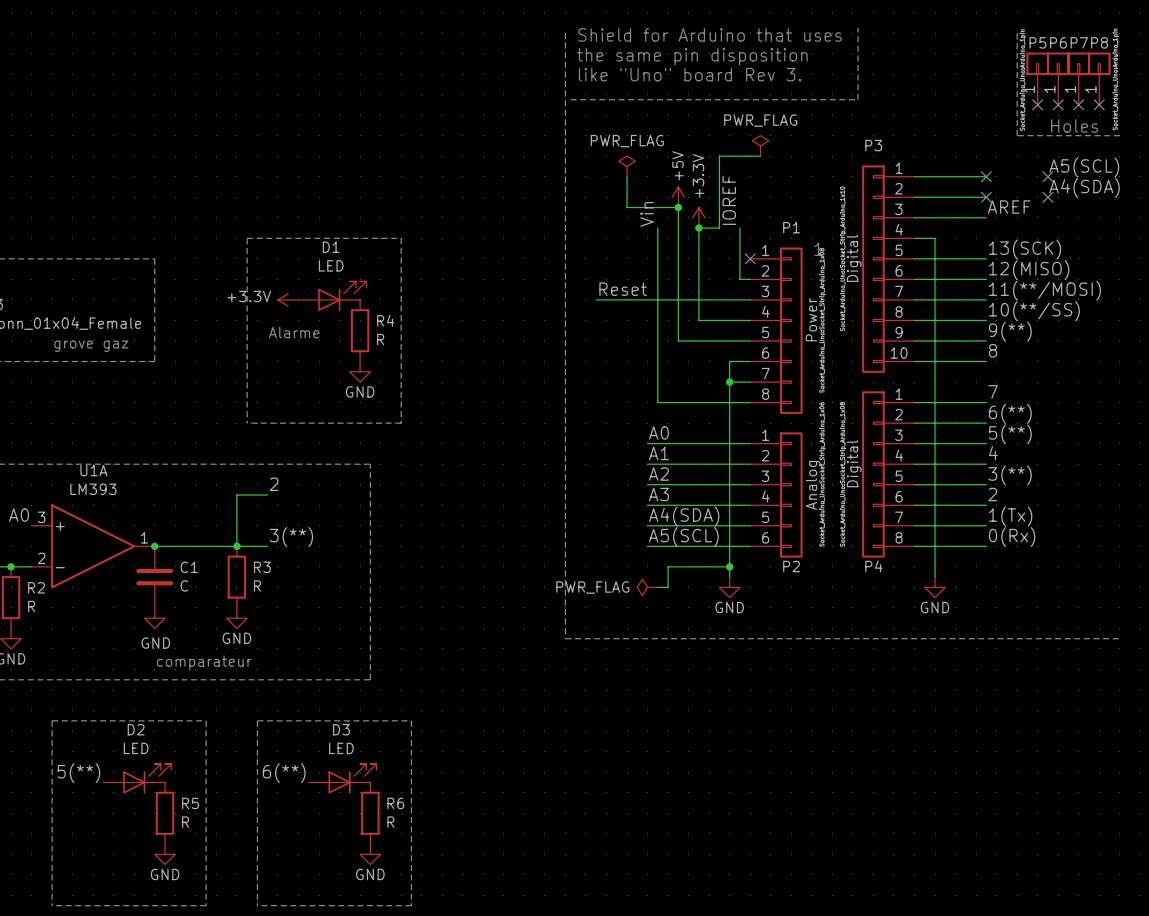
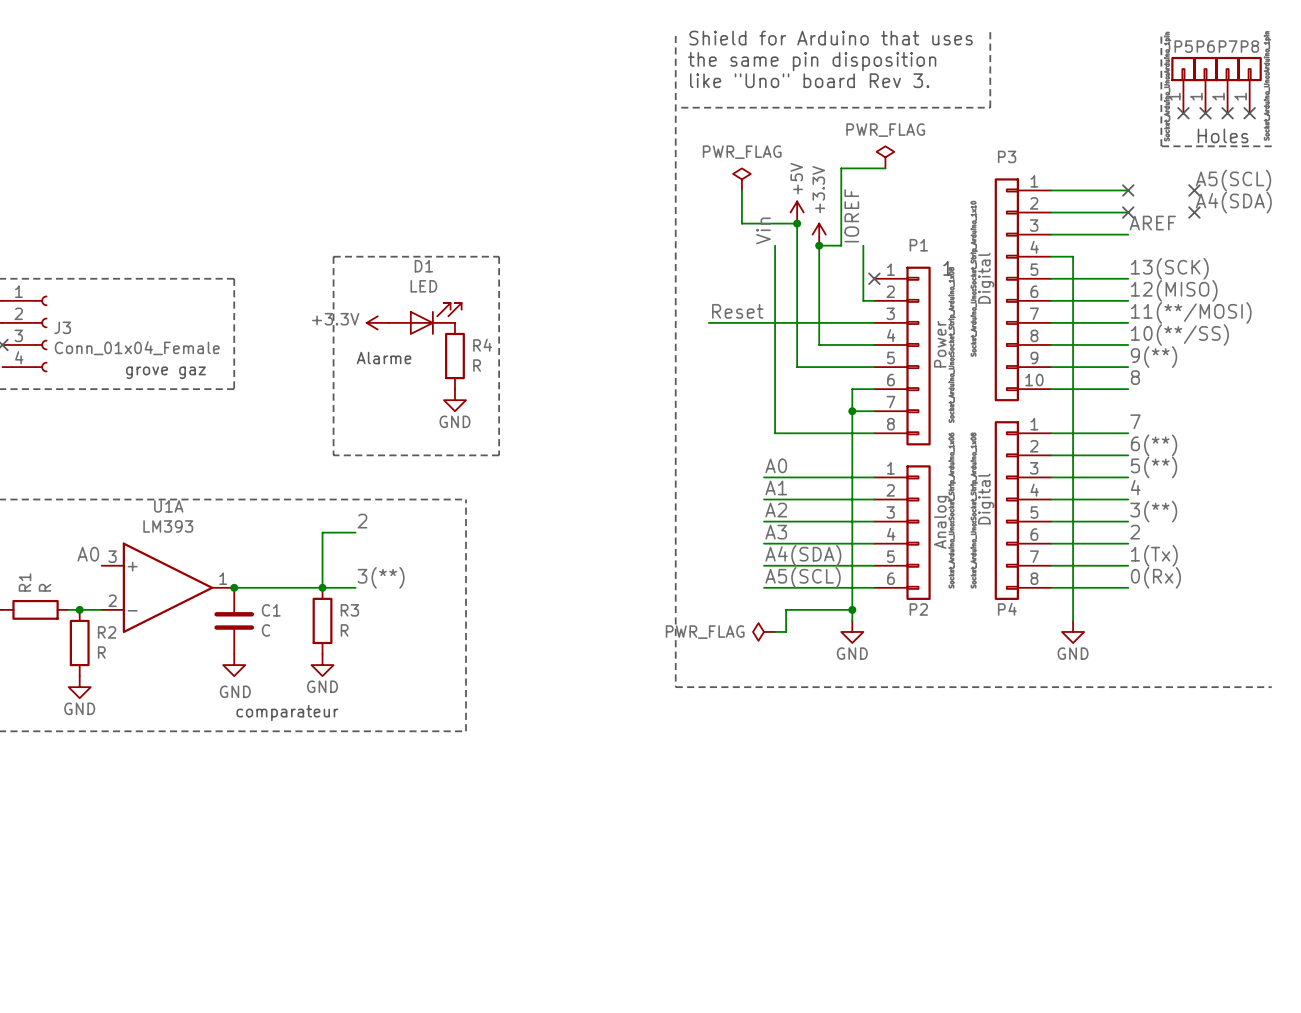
line: (52, 720) (206, 720) (206, 905) (52, 905) (52, 720) -> none
line: (257, 720) (411, 720) (411, 905) (257, 905) (257, 720) -> none
label: 5(**) (78, 773) -> none
label: 6(**) (284, 773) -> none
D2: LED (137, 778) -> none
D3: LED (342, 778) -> none
R5: R (165, 813) -> none
R6: R (370, 813) -> none
power symbol: GND (165, 854) -> none
power symbol: GND (370, 854) -> none

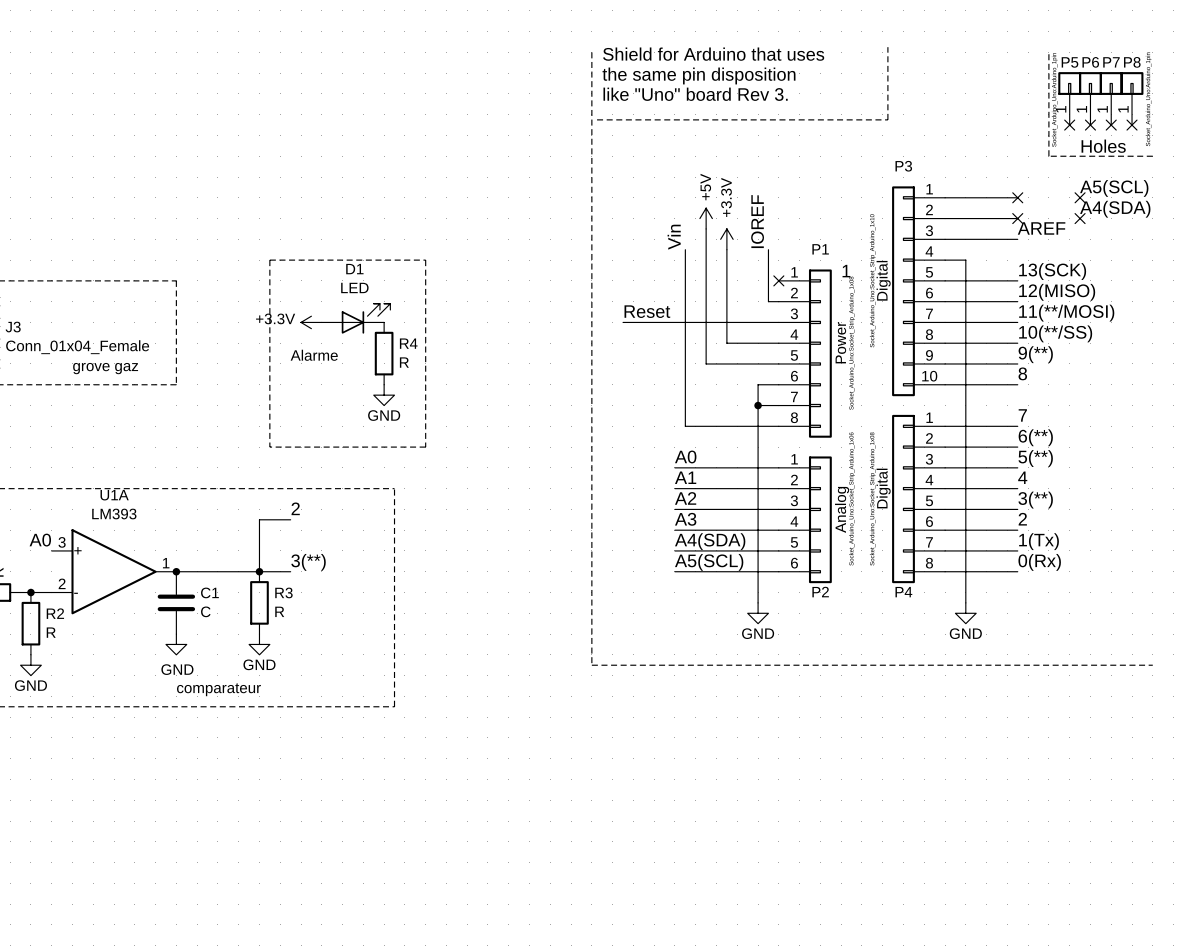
power symbol: PWR_FLAG (885, 157) -> none
wire: (885, 168) (841, 168) (841, 245) (819, 245) -> none
power symbol: PWR_FLAG (741, 179) -> none
wire: (741, 190) (741, 223) (797, 223) -> none
junction: (797, 223) -> none
junction: (819, 245) -> none
wire: (852, 609) (786, 609) (786, 631) (775, 631) -> none
junction: (852, 609) -> none
power symbol: PWR_FLAG (764, 631) -> none

